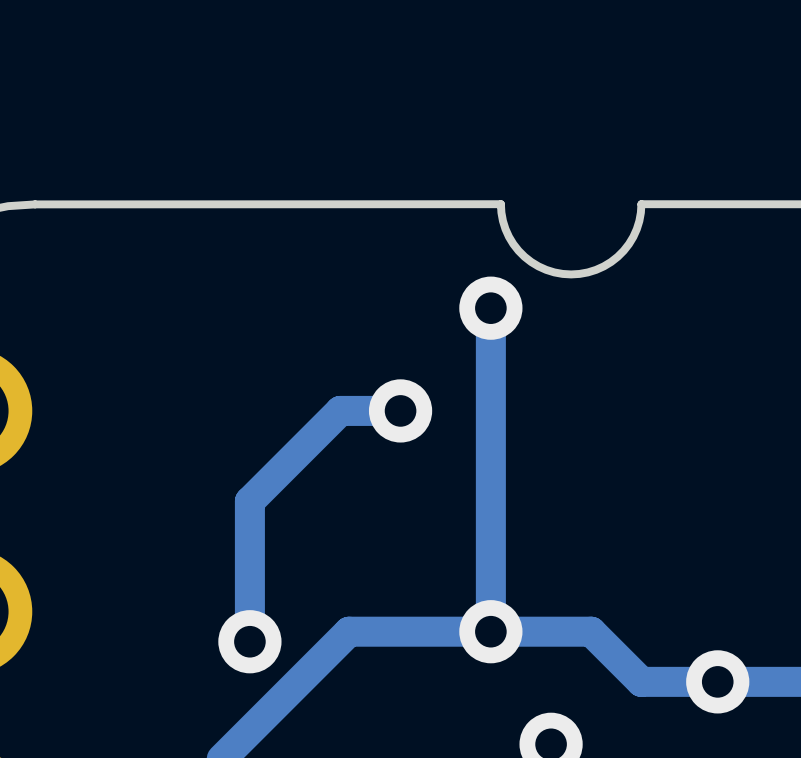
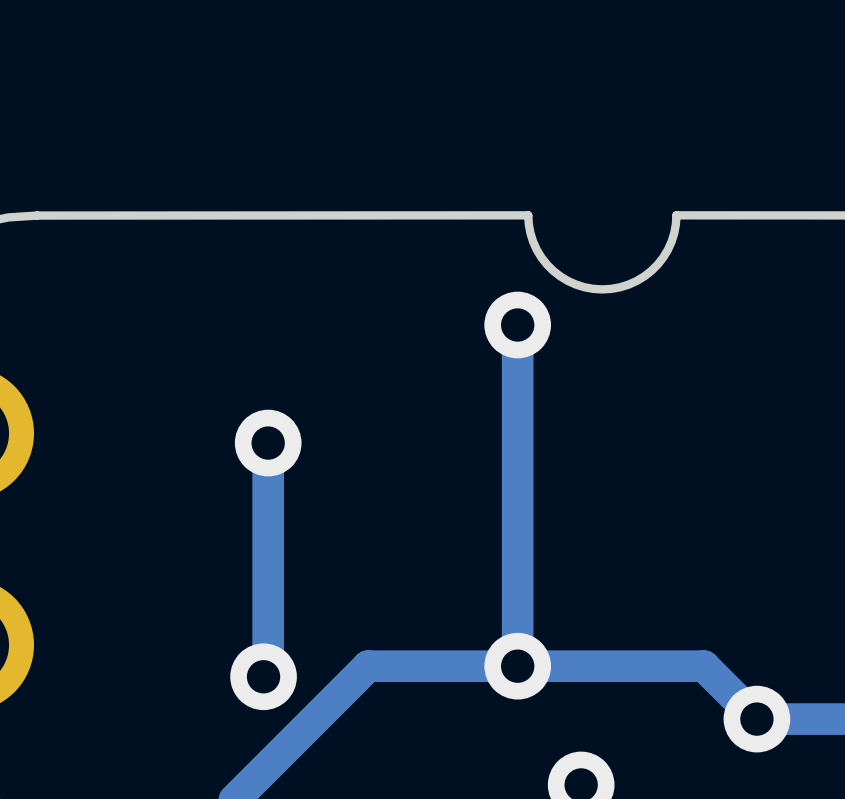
track: (400, 410) (340, 410) (249, 501) (249, 641) -> (268, 443) (268, 672) (263, 676)
via position: (400, 410) -> (268, 443)
track: (591, 631) (641, 681) (717, 681) -> (623, 666) (704, 666) (756, 719)

